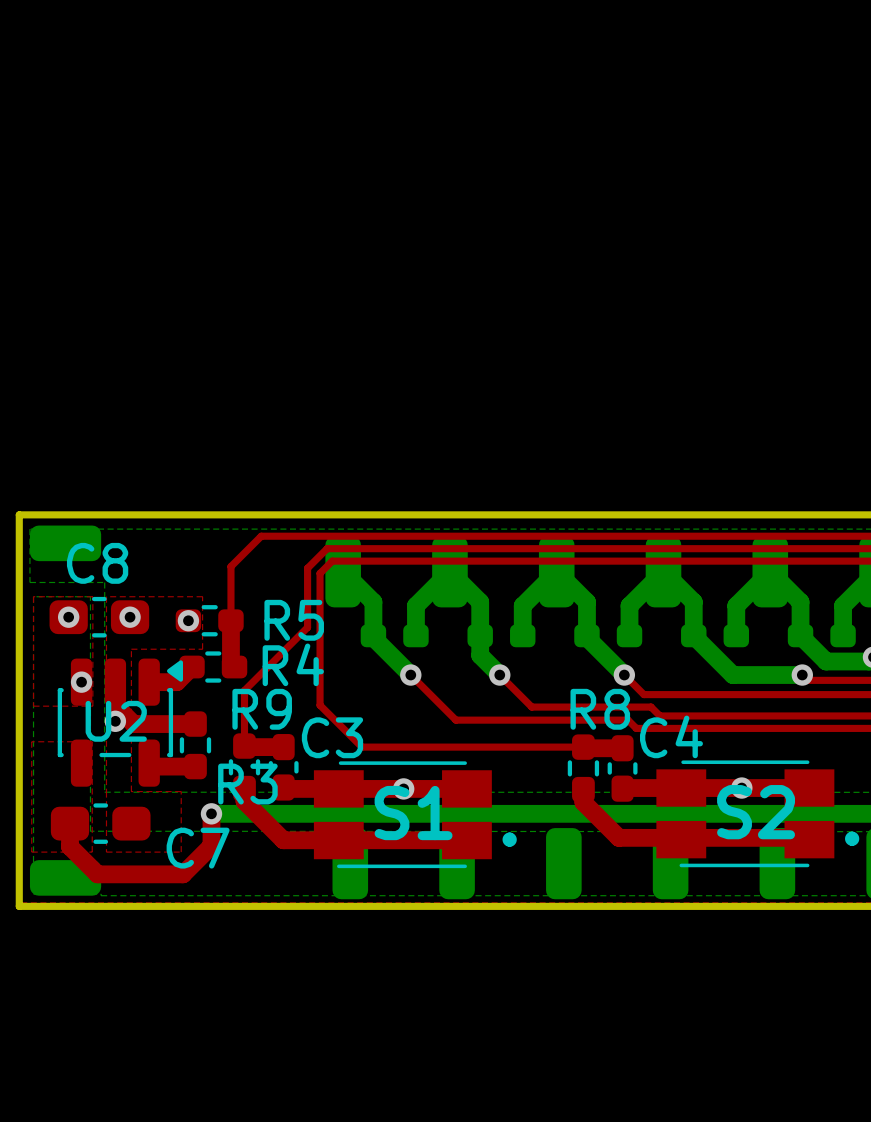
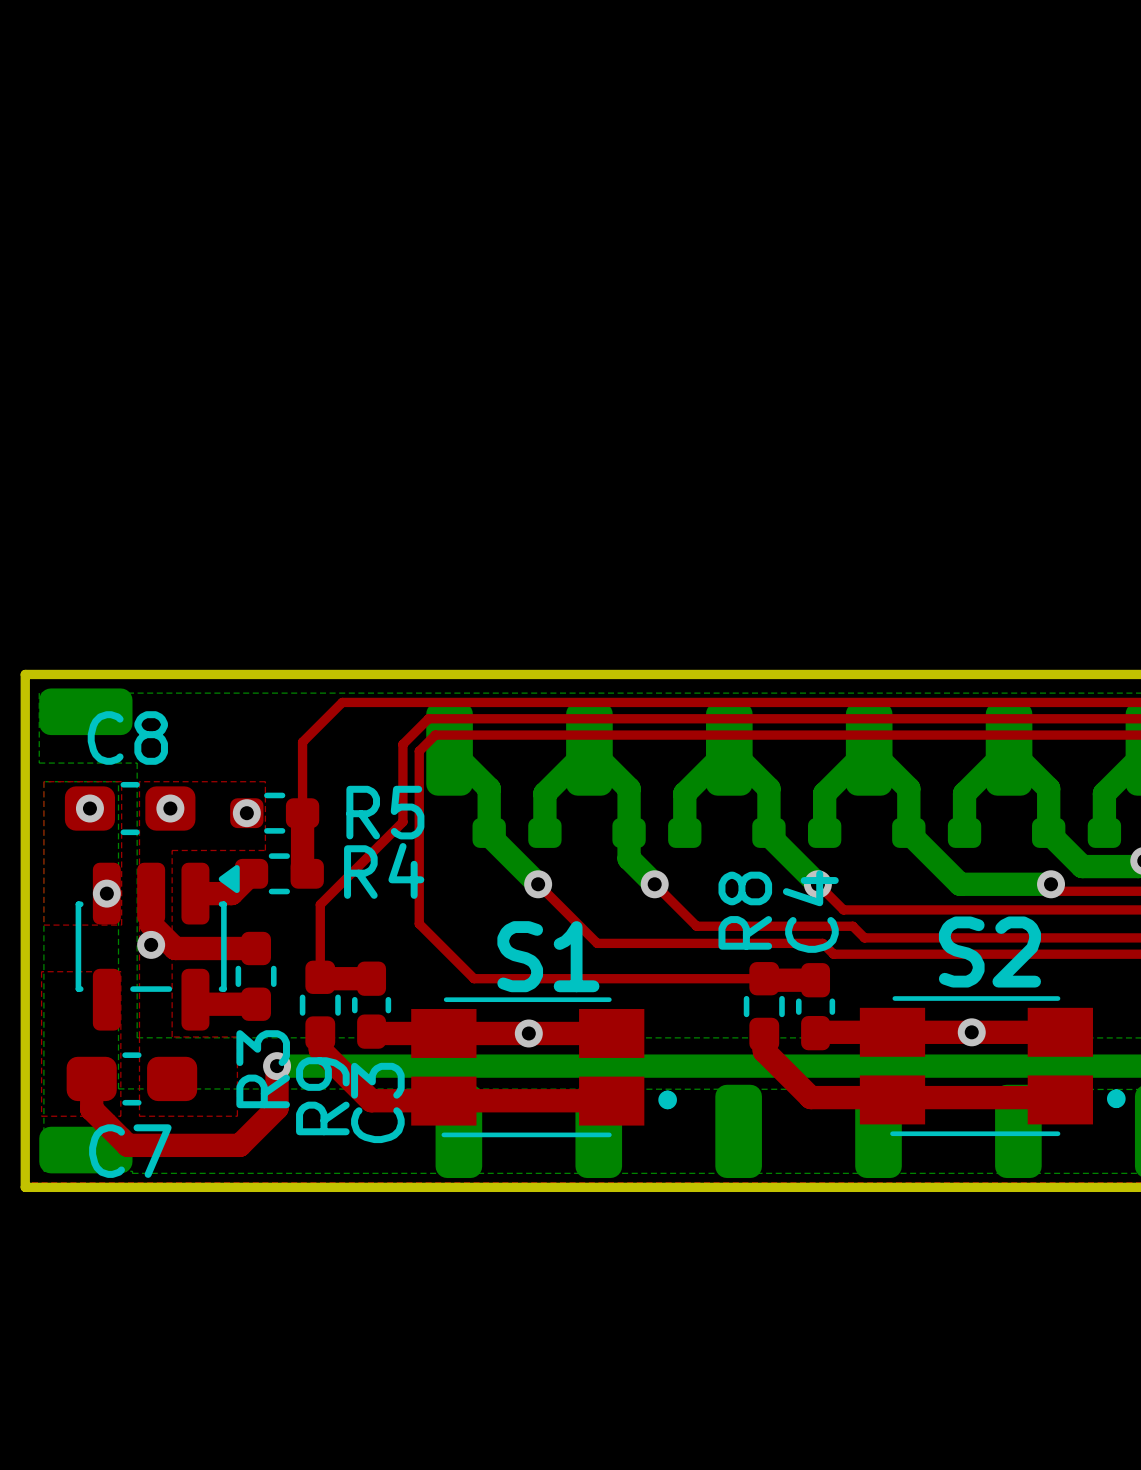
R9 name rotation: 0° (262, 709) -> 90° counterclockwise (322, 1096)
R9 name position: R9 (262, 709) -> R9 (322, 1096)
R8 name rotation: 0° (600, 709) -> 90° counterclockwise (745, 910)
U2 name: U2 (116, 721) -> none
C4 name rotation: 0° (671, 736) -> 90° counterclockwise (810, 911)
C3 name rotation: 0° (332, 737) -> 90° counterclockwise (377, 1102)
C3 name position: C3 (332, 737) -> C3 (377, 1102)
R3 name rotation: 0° (247, 784) -> 90° counterclockwise (263, 1069)
S2 name position: S2 (756, 812) -> S2 (989, 952)
S1 name position: S1 (413, 813) -> S1 (548, 956)
C7 name position: C7 (198, 848) -> C7 (130, 1151)

